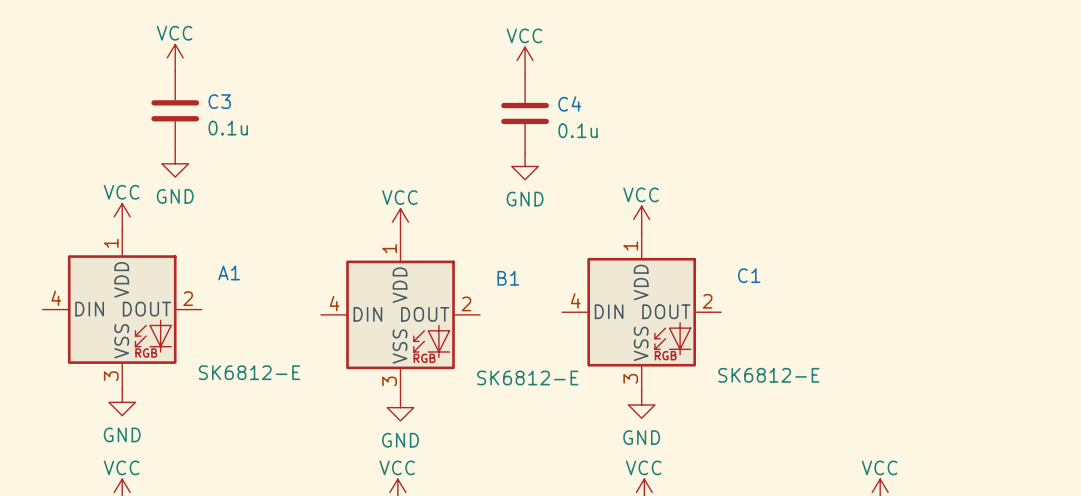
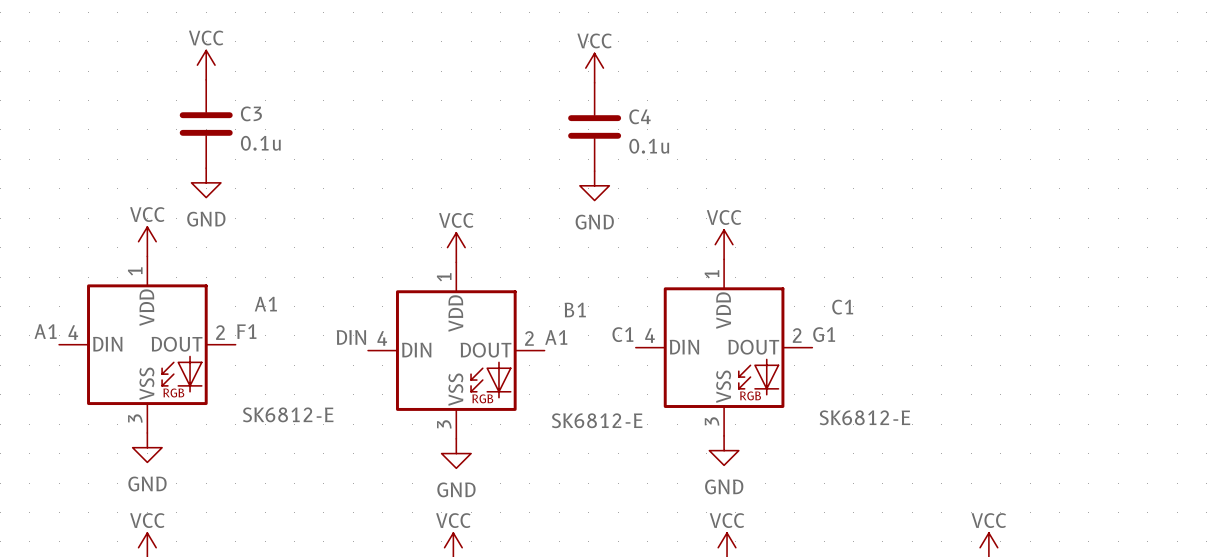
label: none -> A1 (45, 331)
label: none -> F1 (246, 331)
label: none -> C1 (622, 334)
label: none -> G1 (824, 334)
label: none -> DIN (351, 337)
label: none -> A1 (556, 337)

